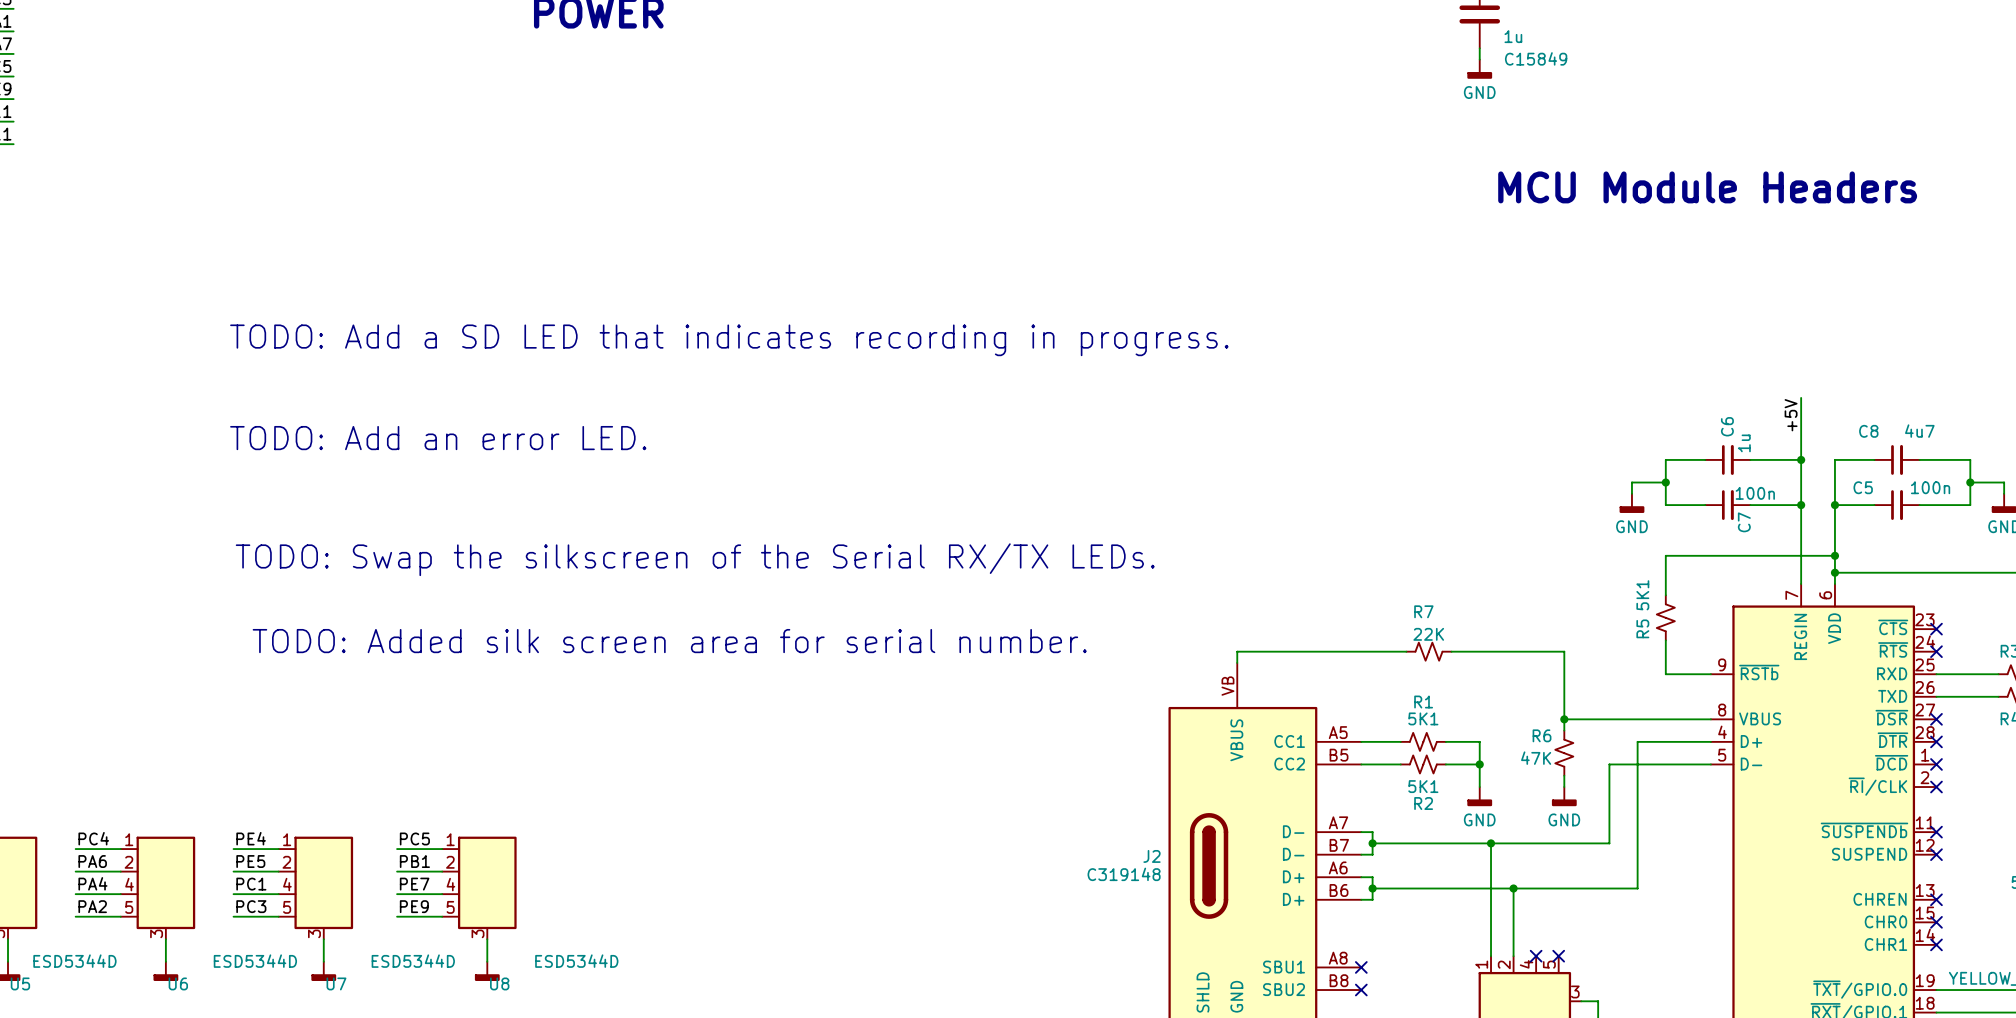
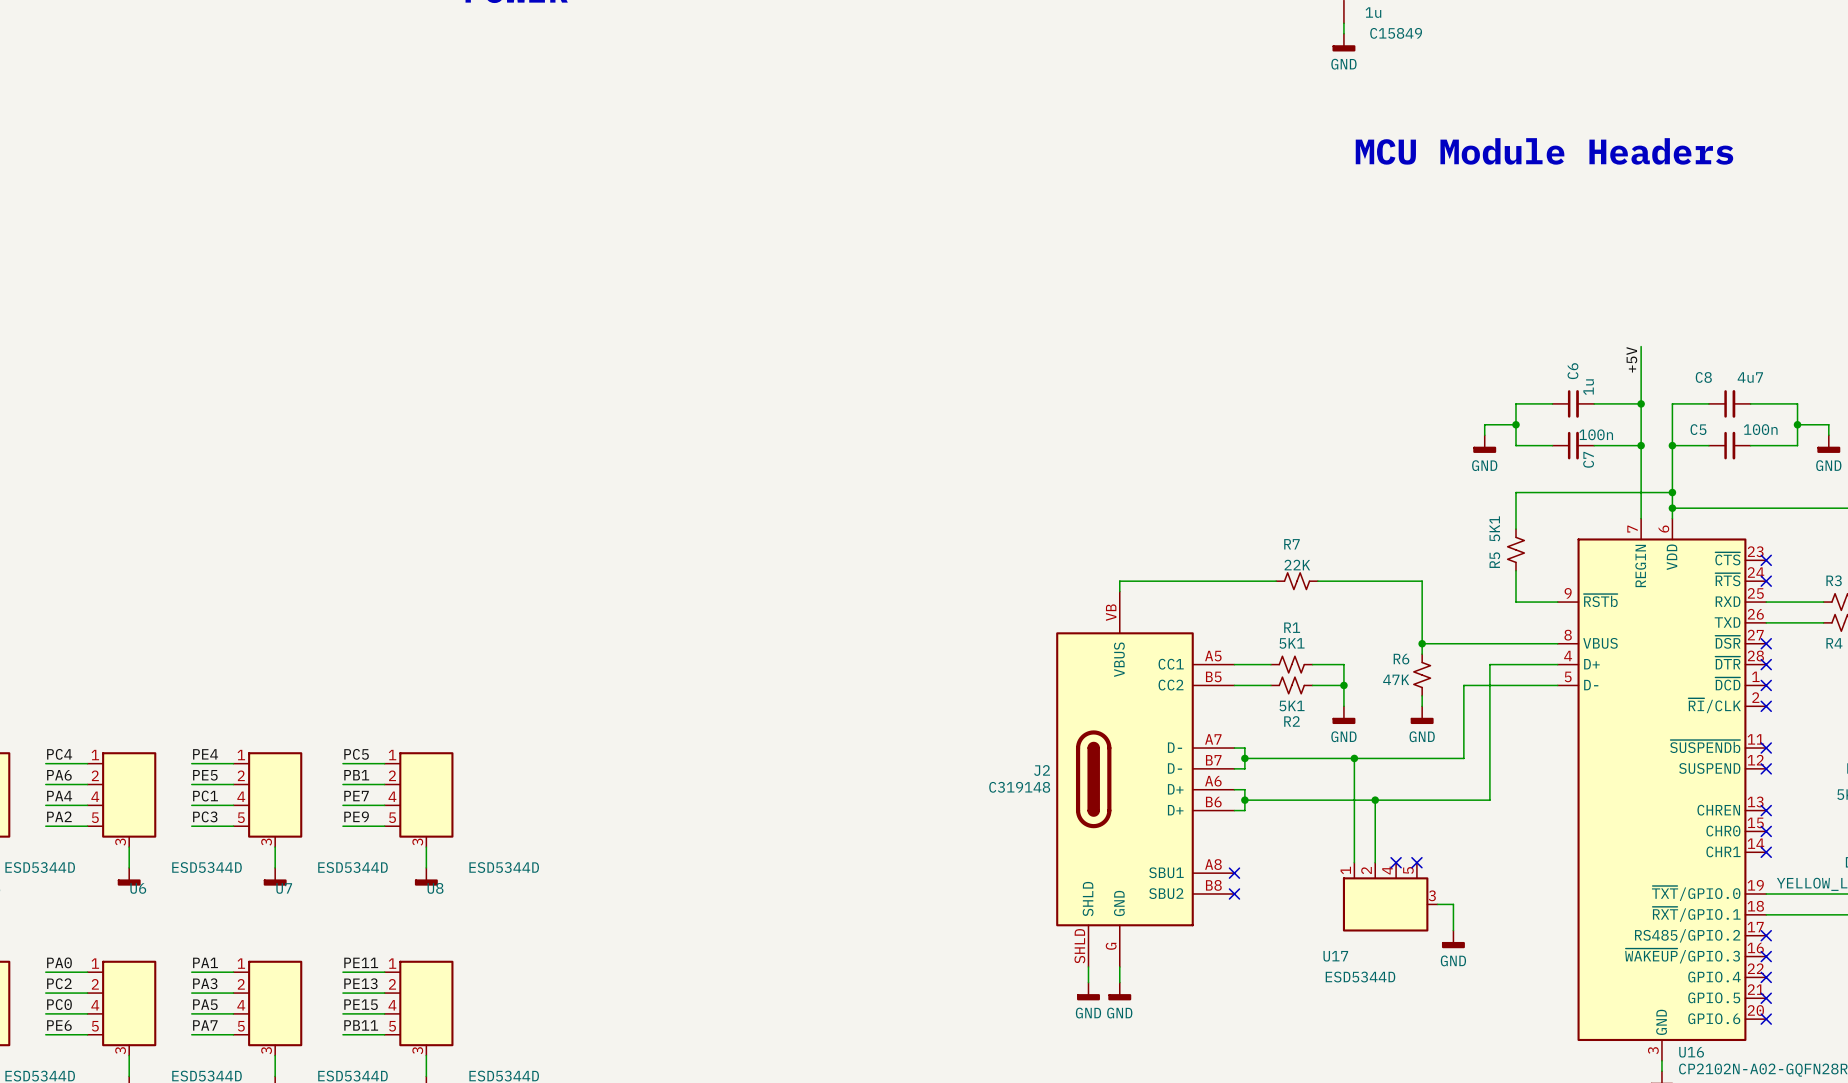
text: TODO: Add a SD LED that indicates recording in progress. (729, 340) -> none
text: TODO: Add an error LED. (438, 438) -> none
text: TODO: Swap the silkscreen of the Serial RX/TX LEDs. (695, 559) -> none
text: TODO: Added silk screen area for serial number. (669, 641) -> none

